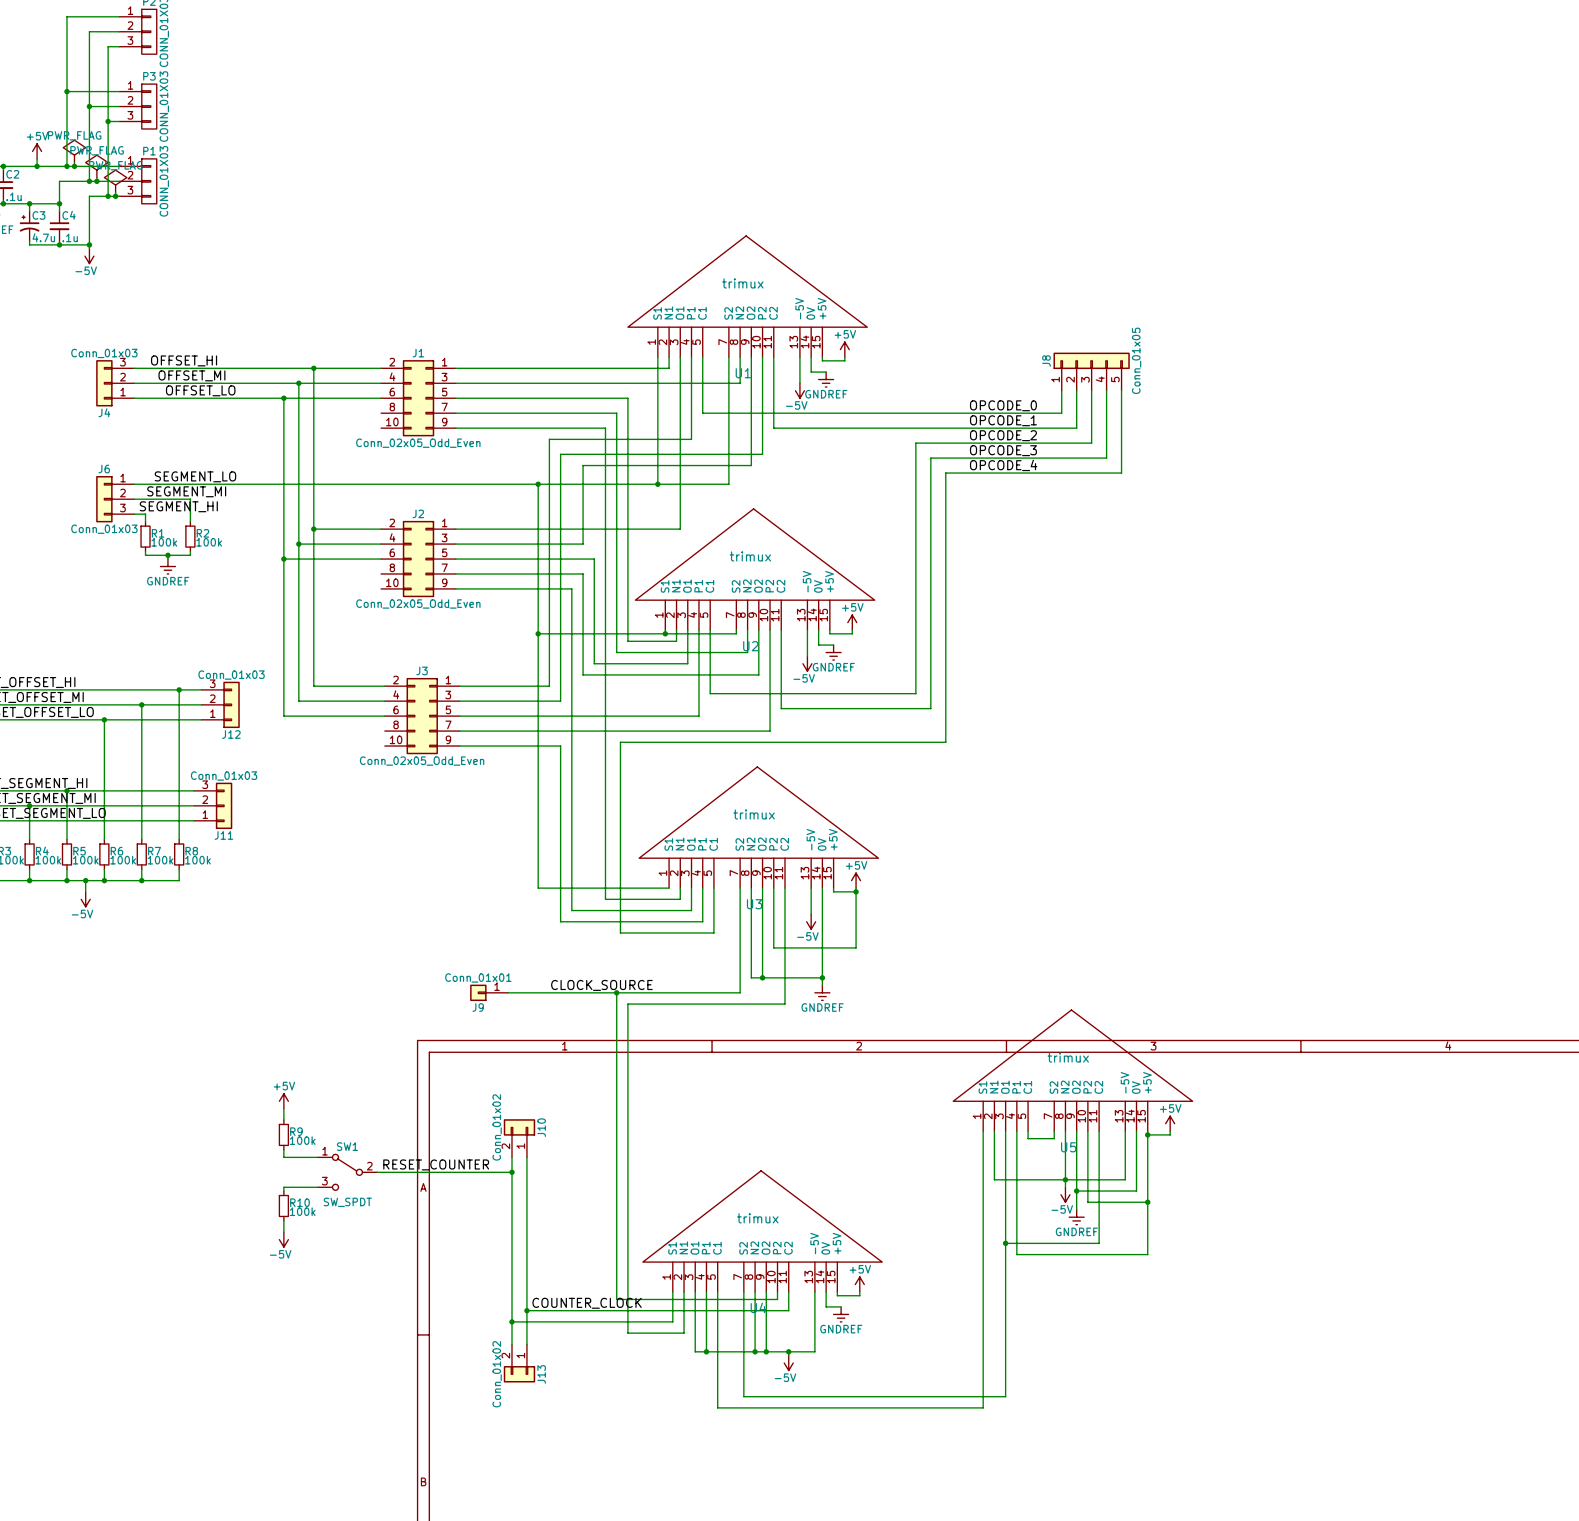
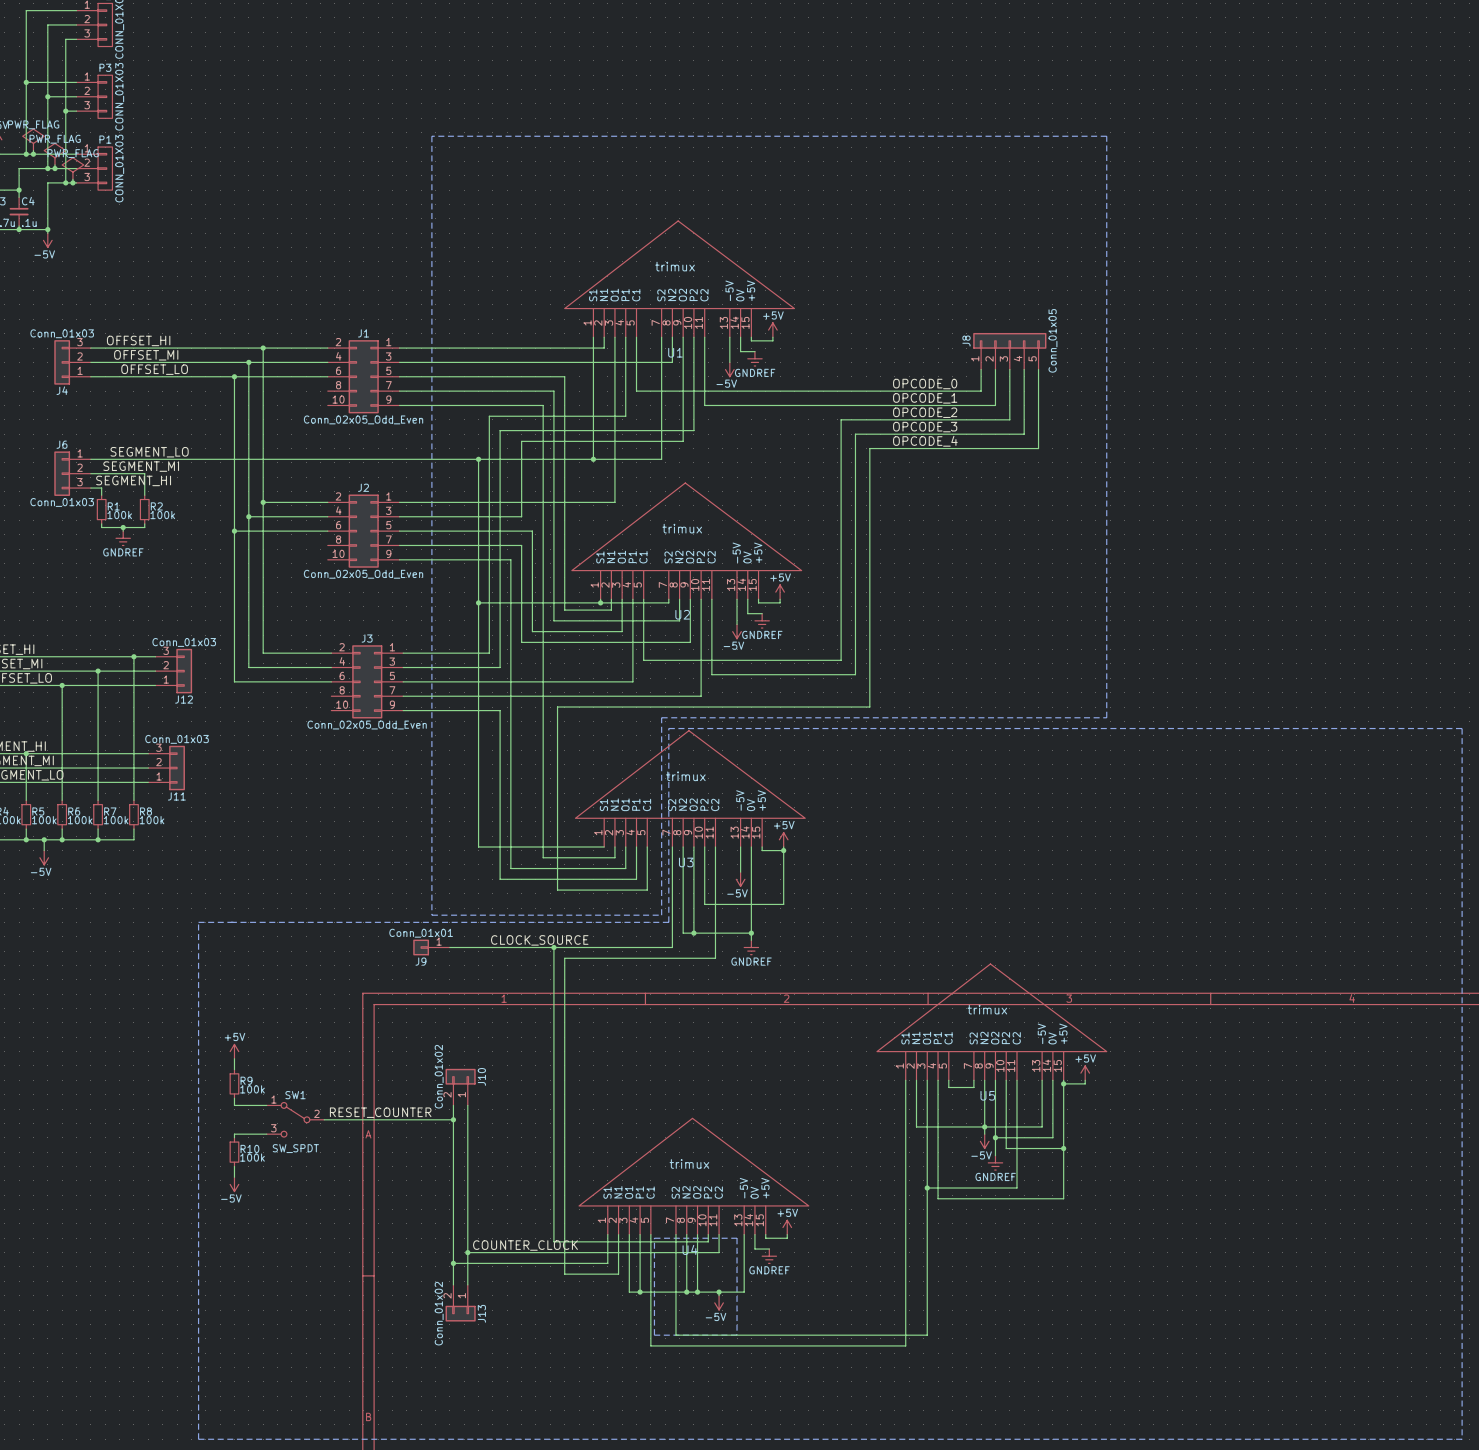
line: none -> (431, 136) (1106, 136) (1106, 717) (661, 717) (661, 915) (431, 915) (431, 136)
line: none -> (668, 728) (668, 922) (198, 922) (198, 1439) (1462, 1439) (1462, 728) (668, 728)
line: none -> (654, 1238) (737, 1238) (737, 1335) (654, 1335) (654, 1238)

